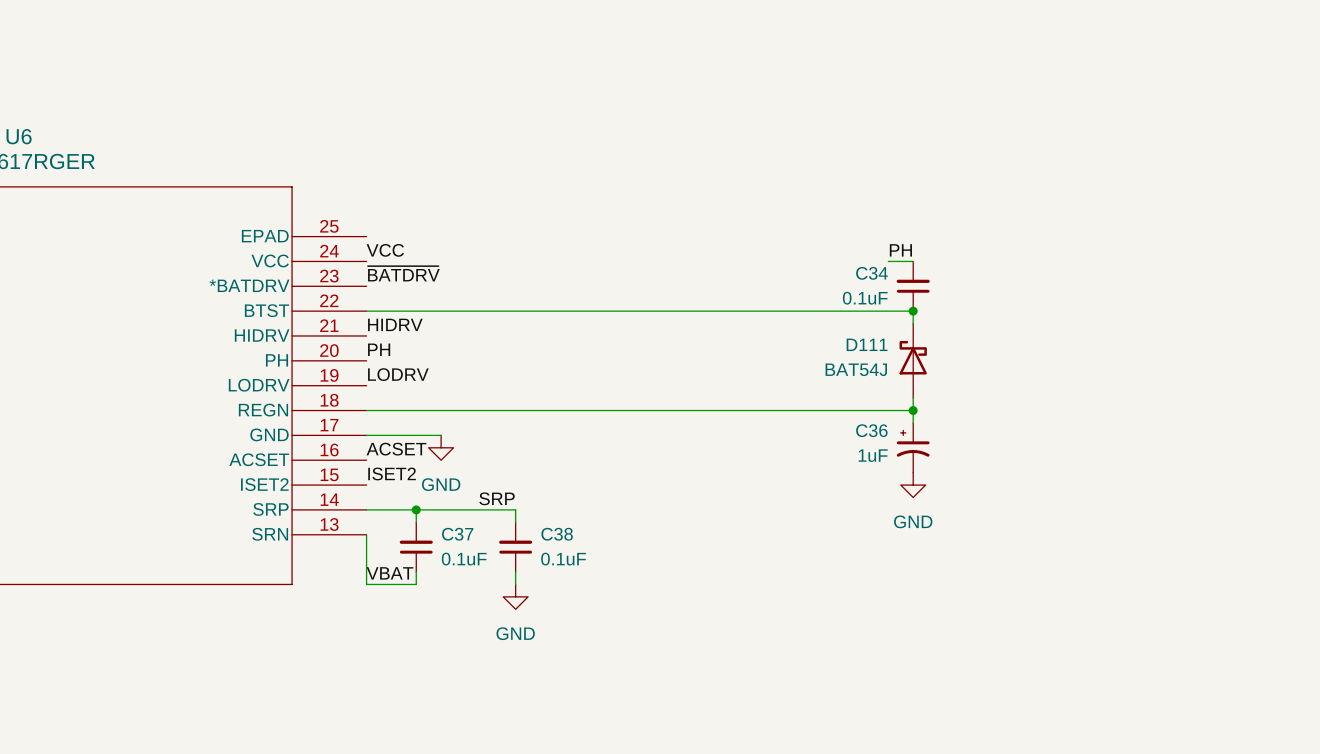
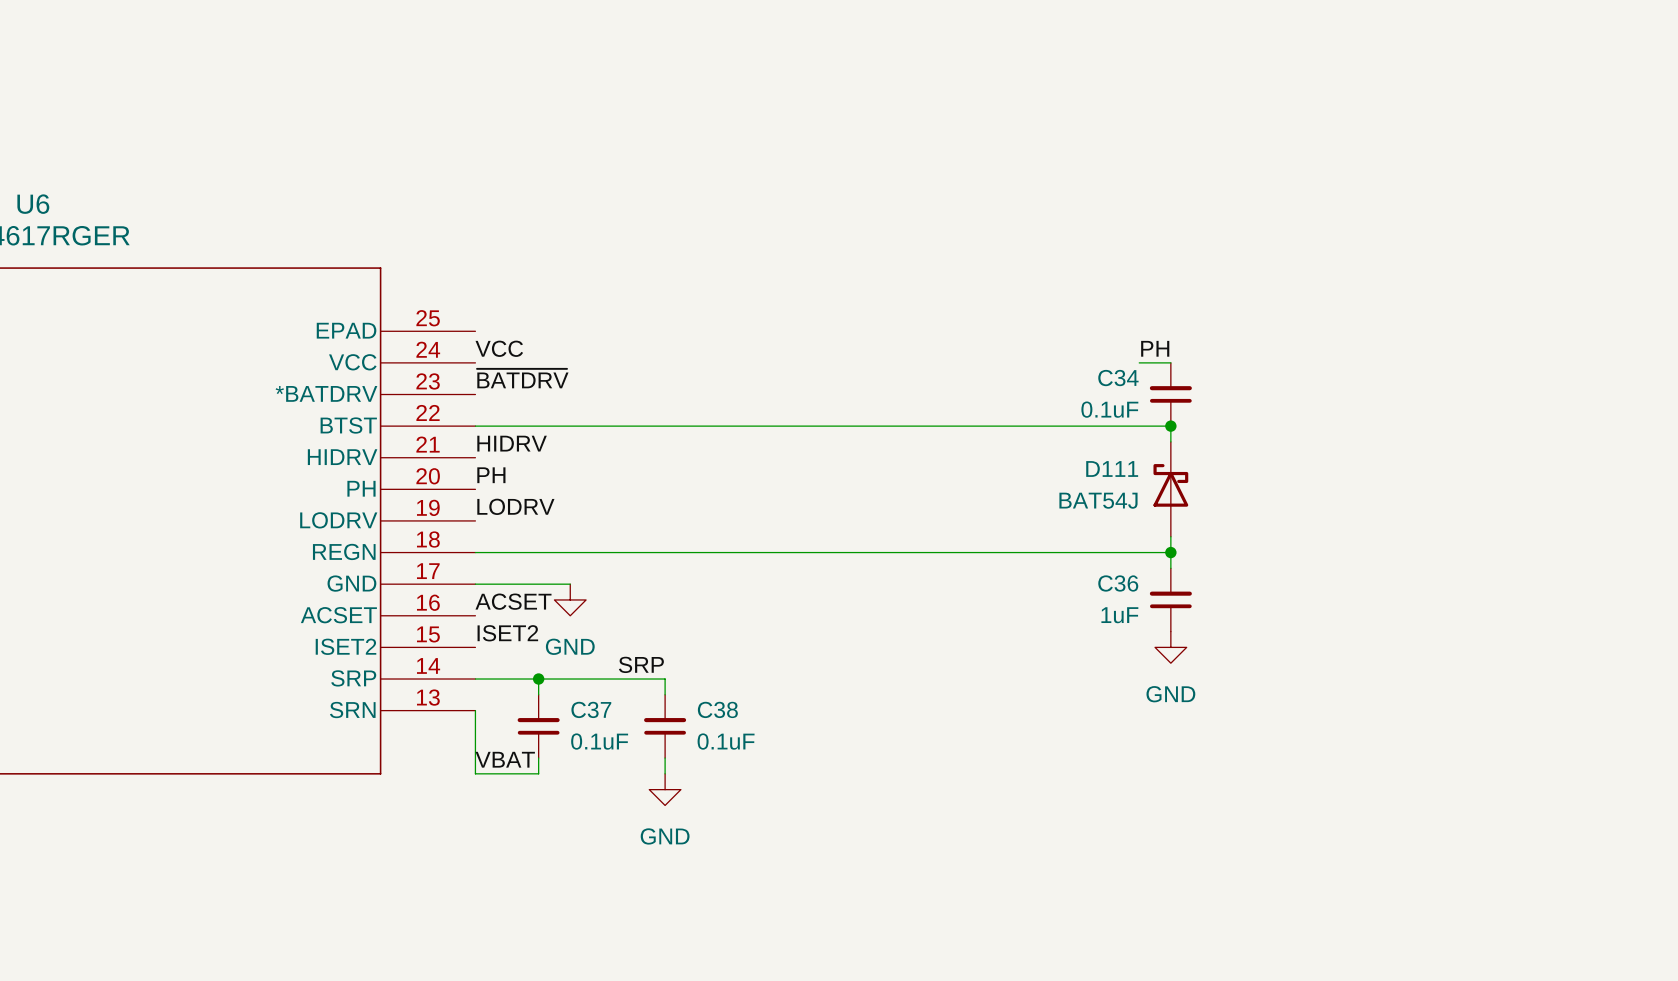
C36 symbol: [896, 422, 930, 473] -> [1149, 568, 1192, 632]

